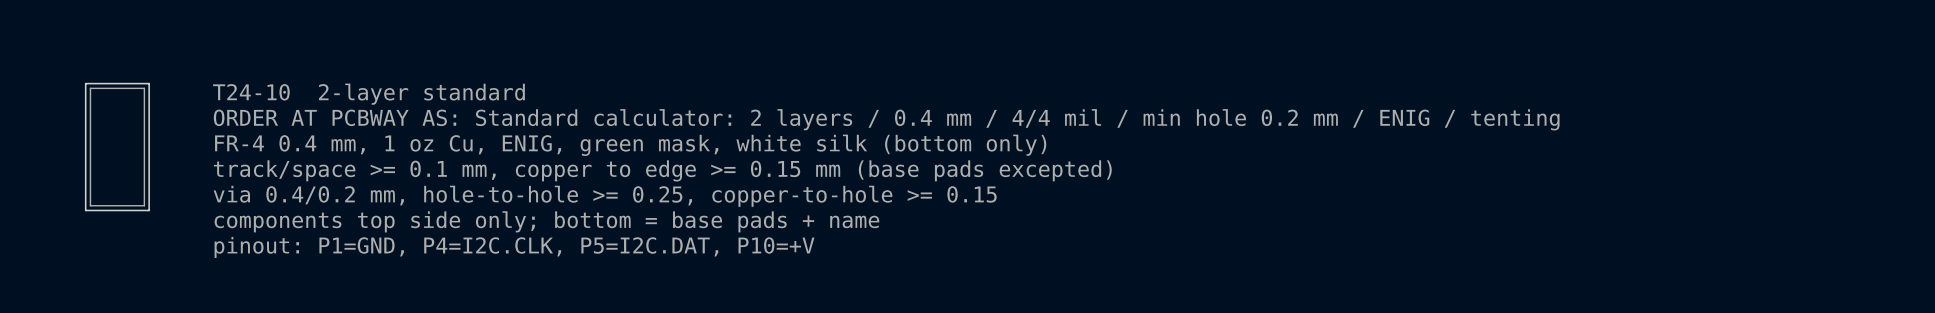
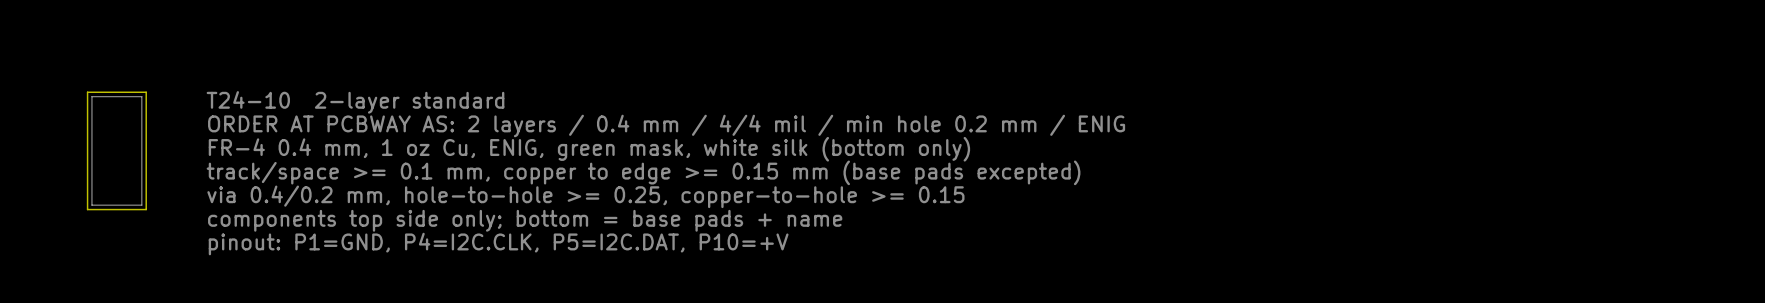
text: ORDER AT PCBWAY AS: Standard calculator: 2 layers / 0.4 mm / 4/4 mil / min hole 0.2 mm / ENIG / tenting (886, 119) -> ORDER AT PCBWAY AS: 2 layers / 0.4 mm / 4/4 mil / min hole 0.2 mm / ENIG (666, 125)

